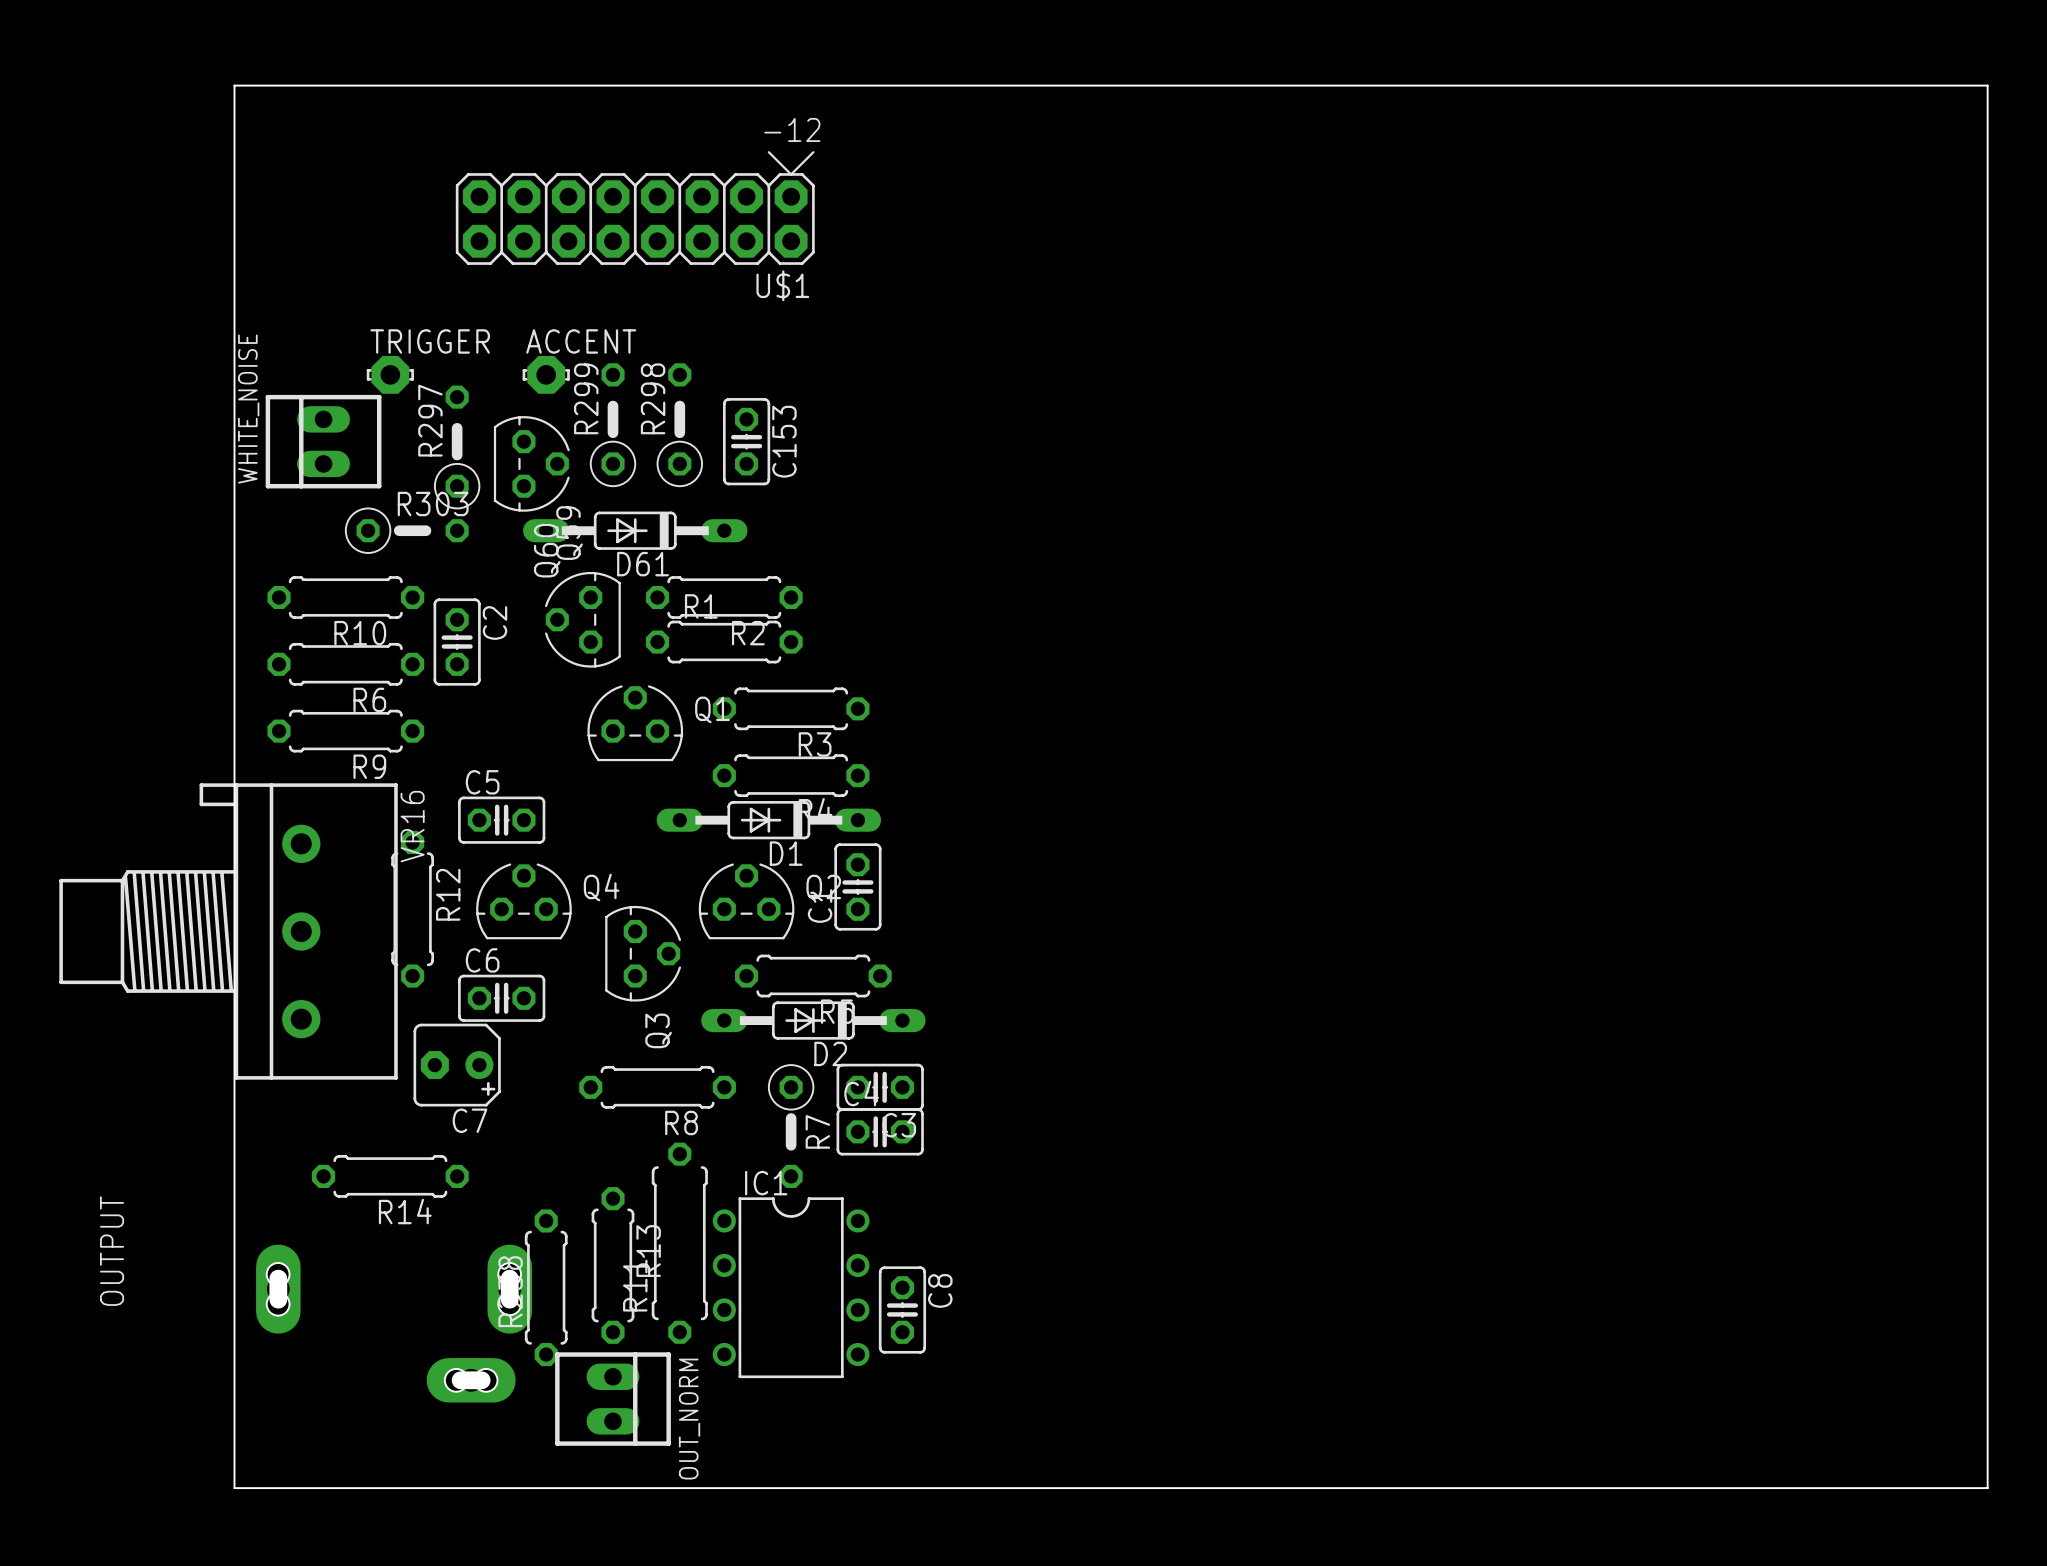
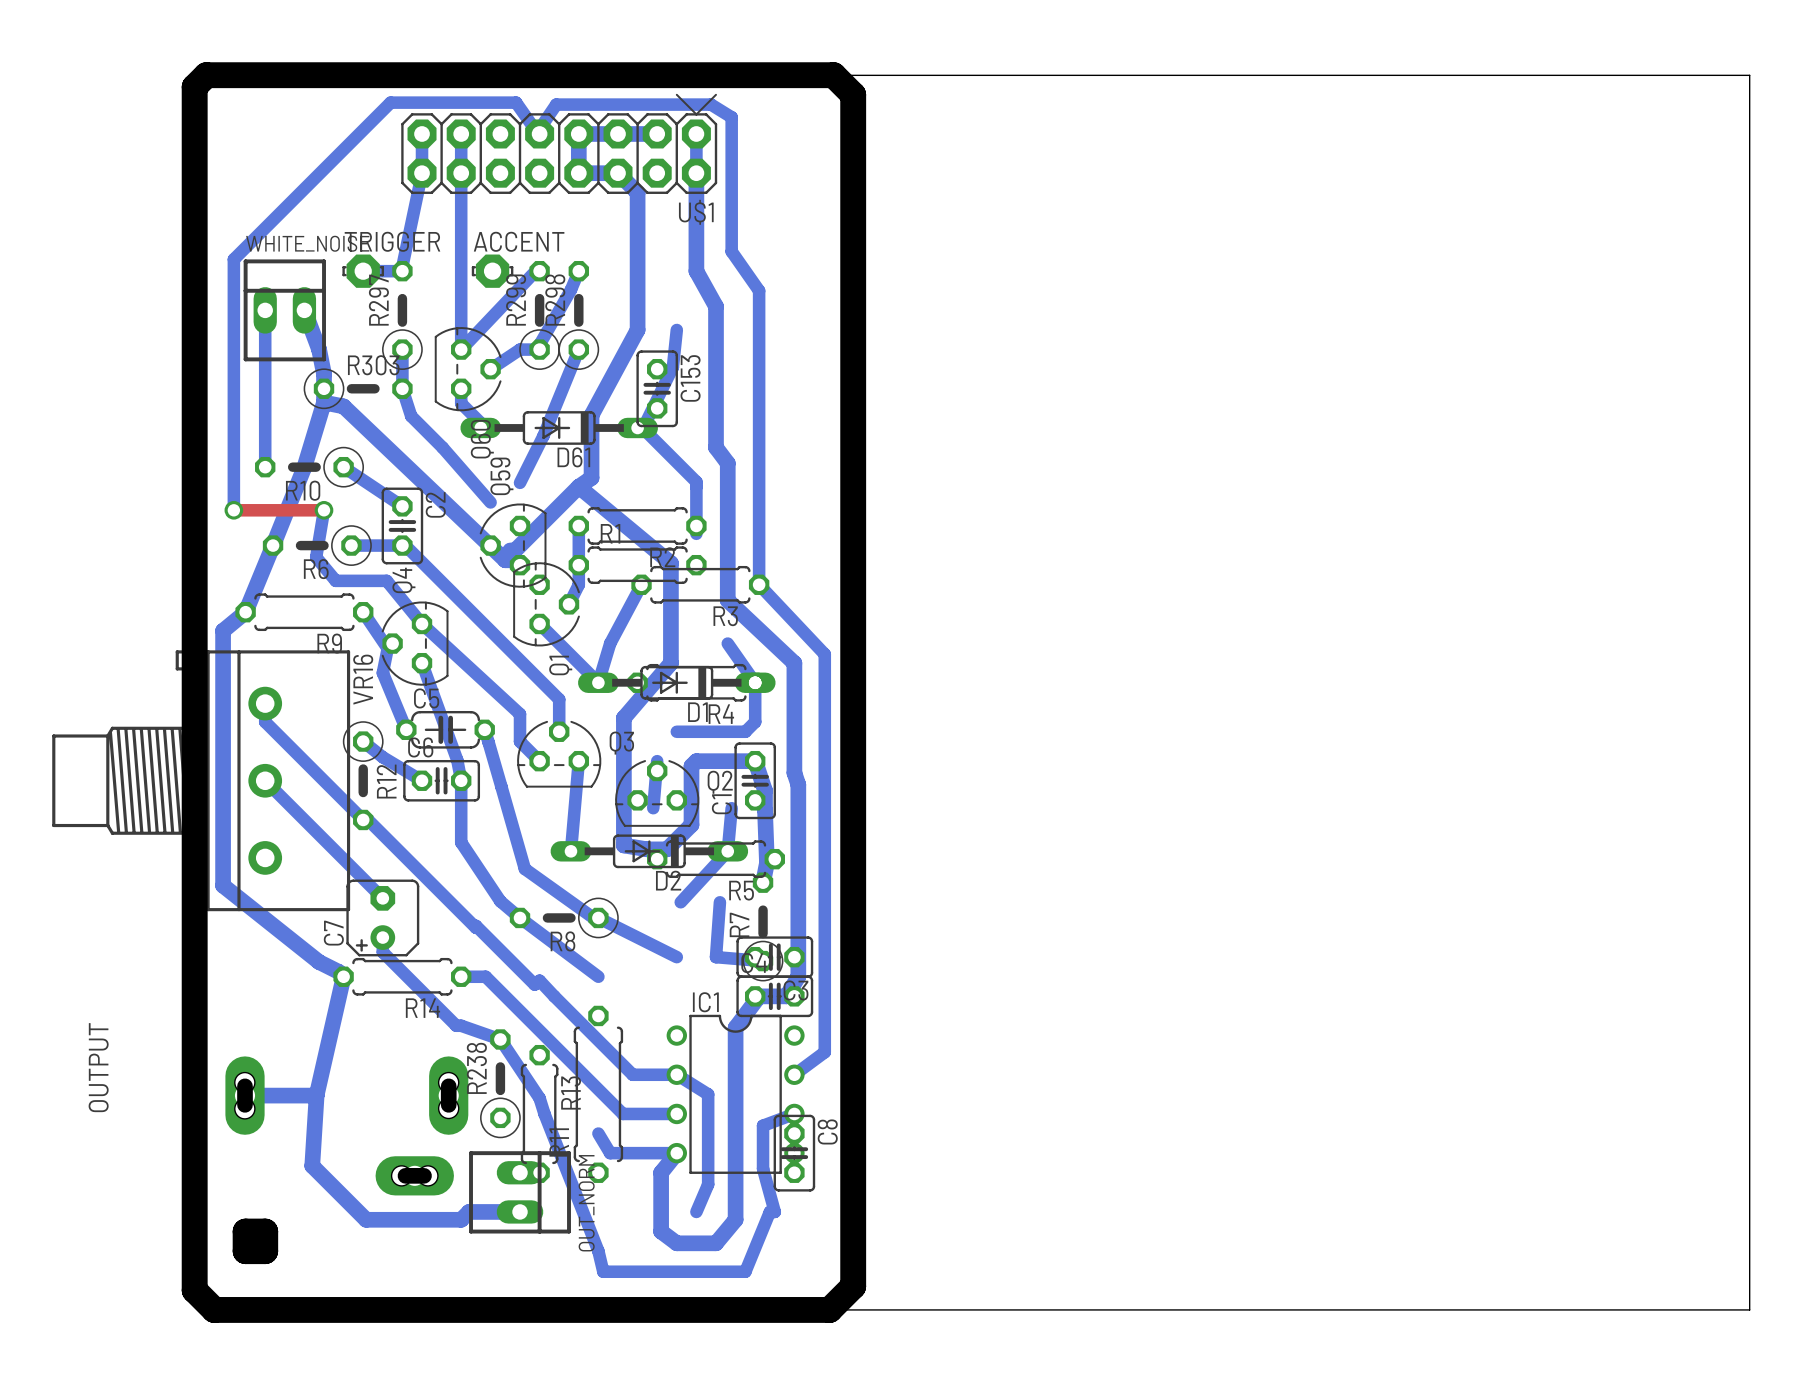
board edge: none -> (206, 75) (833, 75) (853, 94) (853, 1286) (829, 1309) (214, 1309) (194, 1290) (194, 86) (206, 75)
bottom track: none -> (422, 133) (422, 173) (402, 271) (363, 271)
bottom track: none -> (461, 133) (461, 349) (535, 271)
bottom track: none -> (657, 133) (578, 133) (578, 173) (618, 173) (637, 192) (637, 329) (591, 415) (591, 477) (578, 486)
bottom track: none -> (696, 133) (696, 271) (716, 306) (716, 447) (727, 463) (727, 600) (794, 663) (794, 772) (798, 784) (798, 976) (786, 996) (759, 996) (735, 1027) (735, 1219) (716, 1243) (676, 1243) (661, 1231) (661, 1172) (676, 1153) (610, 1153) (598, 1133)
U$1 position: (635, 207) -> (559, 143)
bottom track: none -> (578, 271) (570, 289) (539, 344) (539, 349) (520, 349) (490, 369)
bottom track: none -> (265, 310) (265, 467)
bottom track: none -> (304, 310) (319, 349) (324, 374) (324, 402)
TRIGGER position: (390, 374) -> (363, 271)
ACCENT position: (546, 374) -> (492, 271)
bottom track: none -> (676, 329) (672, 367) (642, 428)
bottom track: none -> (402, 349) (402, 388) (411, 416) (442, 447) (490, 502)
bottom track: none -> (578, 349) (543, 435) (520, 482)
R299 position: (613, 425) -> (539, 315)
R298 position: (679, 425) -> (578, 315)
WHITE_NOISE rotation: 0° (323, 441) -> 90° clockwise (284, 310)
WHITE_NOISE position: (323, 441) -> (284, 310)
bottom track: none -> (461, 388) (461, 403) (480, 423) (480, 427)
R297 position: (457, 447) -> (402, 315)
bottom track: none -> (324, 402) (304, 467) (245, 612) (223, 630) (223, 885) (319, 962) (338, 971) (343, 976) (316, 1095)
bottom track: none -> (324, 402) (343, 406) (505, 560) (510, 560)
Q60 position: (531, 463) -> (468, 369)
bottom track: none -> (637, 427) (642, 427) (696, 481) (696, 533)
bottom track: none -> (343, 467) (402, 506)
R303 position: (406, 530) -> (358, 388)
D61 position: (635, 530) -> (559, 427)
bottom track: none -> (578, 486) (670, 563) (670, 663) (623, 718) (623, 845) (647, 849) (667, 849) (691, 824) (691, 766) (696, 761) (755, 761) (765, 790) (766, 863) (763, 882)
bottom track: none -> (578, 486) (515, 550) (510, 550)
R10 footprint: [267, 576, 425, 619] -> [255, 446, 365, 488]
bottom track: none -> (233, 510) (233, 259) (390, 102) (516, 102) (534, 129) (539, 129) (556, 104) (711, 104) (731, 117) (731, 251) (759, 290) (759, 584) (824, 654) (824, 1052) (794, 1074)
top track: none -> (233, 510) (324, 510)
via: none -> (233, 510)
bottom track: none -> (324, 510) (316, 557) (335, 580) (386, 580) (422, 623) (520, 714) (520, 741) (539, 761)
via: none -> (324, 510)
bottom track: none -> (578, 533) (578, 584) (569, 604)
bottom track: none -> (351, 545) (402, 545) (402, 542) (559, 699) (559, 731)
R6 footprint: [267, 642, 425, 686] -> [262, 525, 372, 566]
C2 position: (457, 642) -> (402, 525)
bottom track: none -> (641, 584) (610, 643) (598, 682) (539, 623)
bottom track: none -> (363, 612) (387, 648)
R3 position: (791, 708) -> (700, 584)
Q1 rotation: 0° (635, 723) -> 90° clockwise (546, 604)
R9 position: (345, 731) -> (304, 612)
bottom track: none -> (727, 643) (755, 682) (755, 721) (745, 731) (676, 731)
bottom track: none -> (387, 648) (382, 672) (406, 729)
bottom track: none -> (422, 663) (457, 760) (461, 780) (461, 842) (500, 901) (598, 976)
C5 footprint: [458, 796, 546, 844] -> [396, 710, 495, 749]
bottom track: none -> (265, 703) (265, 721) (363, 819) (368, 819) (534, 984) (539, 980) (632, 1074) (676, 1074) (708, 1094) (708, 1184) (696, 1211)
D1 position: (768, 820) -> (676, 682)
bottom track: none -> (484, 729) (524, 868) (593, 917) (598, 917) (676, 957)
R12 footprint: [391, 830, 434, 988] -> [342, 721, 384, 831]
bottom track: none -> (363, 741) (382, 757) (422, 780)
bottom track: none -> (578, 761) (570, 851)
bottom track: none -> (657, 761) (653, 808)
bottom track: none -> (265, 780) (382, 898)
Q4 rotation: 0° (523, 901) -> 90° counterclockwise (415, 643)
Q4 position: (523, 901) -> (415, 643)
bottom track: none -> (731, 808) (727, 851) (680, 902)
VR16 position: (228, 931) -> (201, 780)
Q3 rotation: 0° (643, 953) -> 90° counterclockwise (559, 754)
Q3 position: (643, 953) -> (559, 754)
C6 position: (501, 998) -> (441, 780)
D2 position: (813, 1020) -> (649, 851)
bottom track: none -> (719, 902) (716, 957) (763, 961)
bottom track: none -> (382, 937) (382, 952) (456, 1025) (500, 1039) (539, 1098) (598, 1251) (603, 1271) (745, 1271) (769, 1211) (774, 1211) (763, 1168) (763, 1125) (794, 1113)
C7 rotation: 0° (457, 1065) -> 90° clockwise (382, 917)
R8 footprint: [579, 1065, 736, 1109] -> [509, 897, 619, 939]
bottom track: none -> (461, 976) (485, 976) (622, 1113) (676, 1113)
R7 rotation: 0° (791, 1126) -> 180° (763, 926)
R7 position: (791, 1126) -> (763, 926)
R14 position: (390, 1176) -> (402, 976)
R238 footprint: [524, 1209, 568, 1367] -> [480, 1029, 521, 1139]
bottom track: none -> (316, 1095) (312, 1165) (366, 1219) (461, 1219) (469, 1211) (520, 1211)
bottom track: none -> (316, 1095) (245, 1095)
IC1 position: (791, 1287) -> (735, 1094)
OUTPUT position: (394, 1323) -> (346, 1125)
board edge: none -> (245, 1231) (245, 1251) (265, 1251) (265, 1231) (245, 1231)
OUT_NORM position: (613, 1399) -> (520, 1192)

